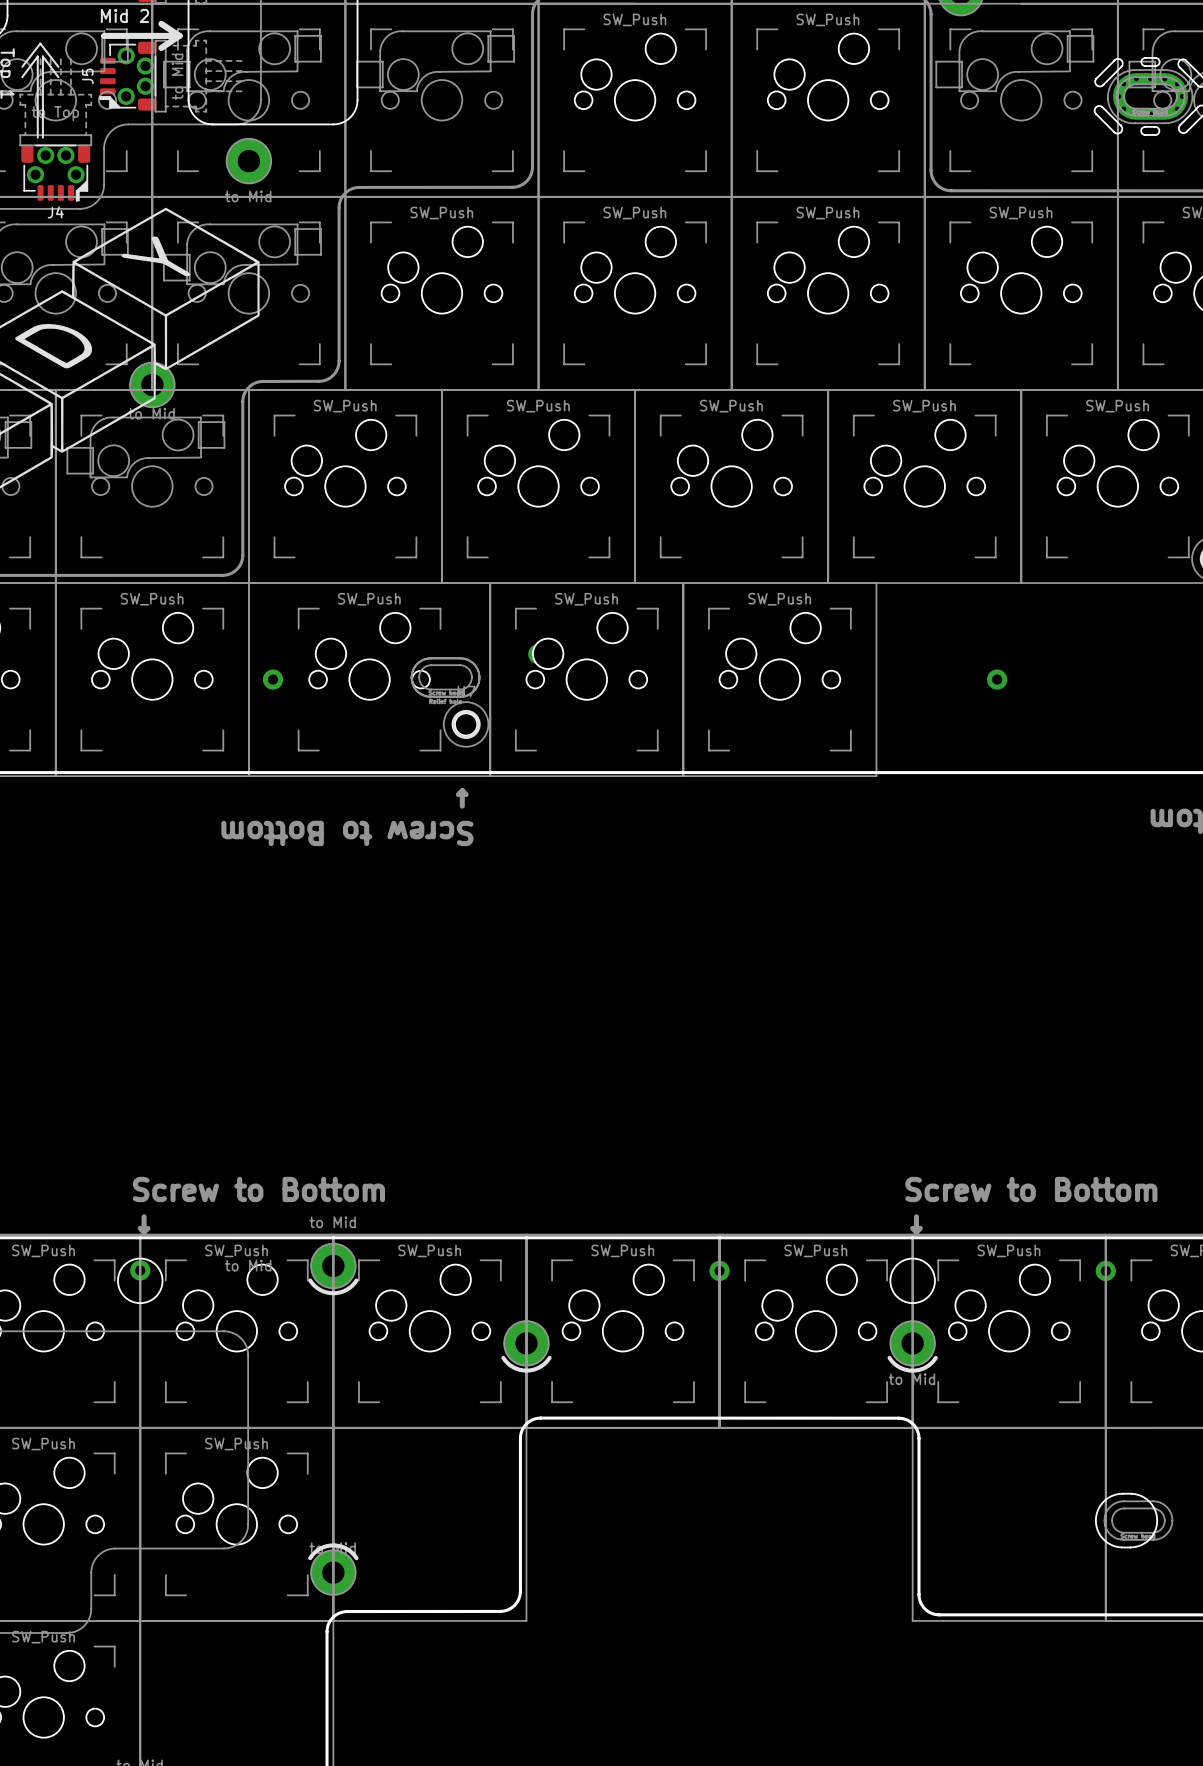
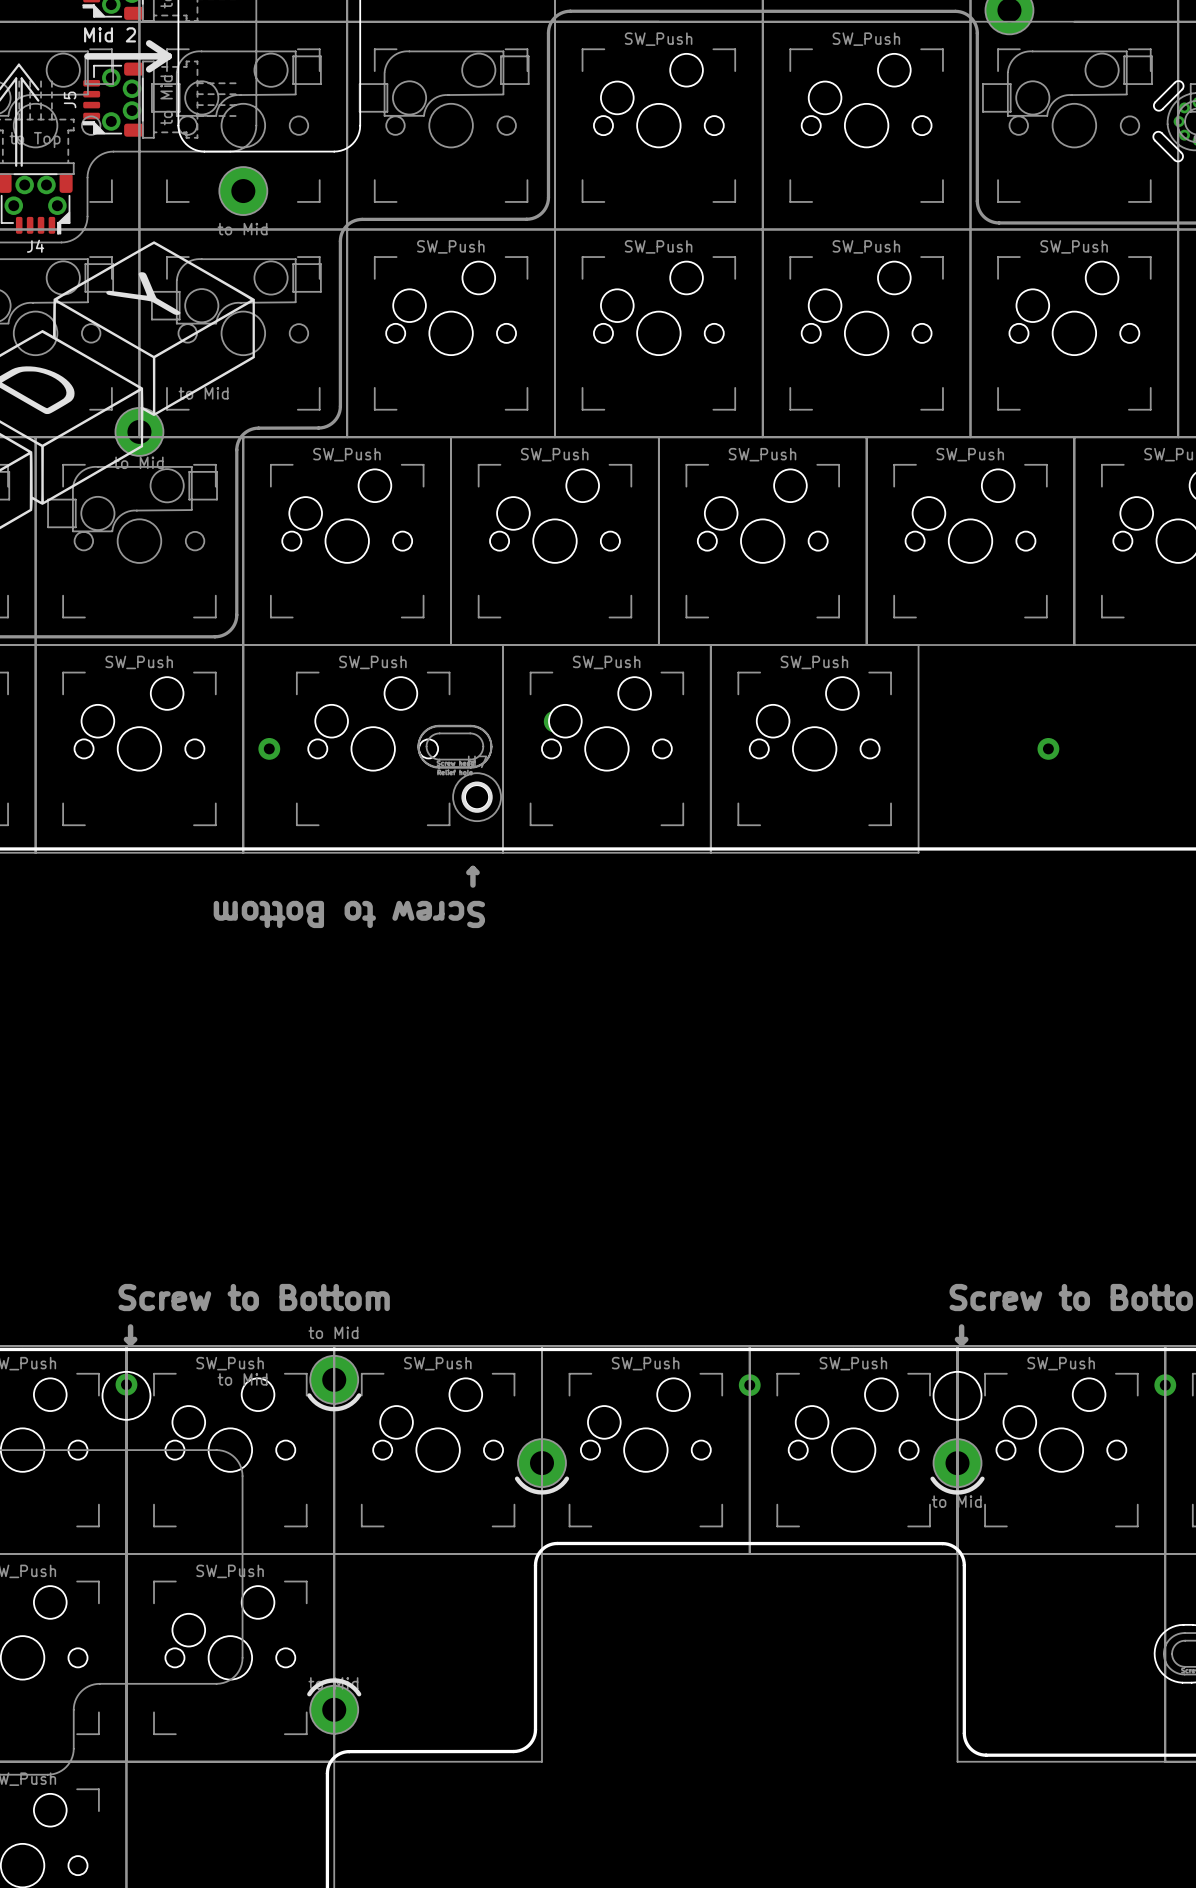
text: none -> to Mid (203, 393)

